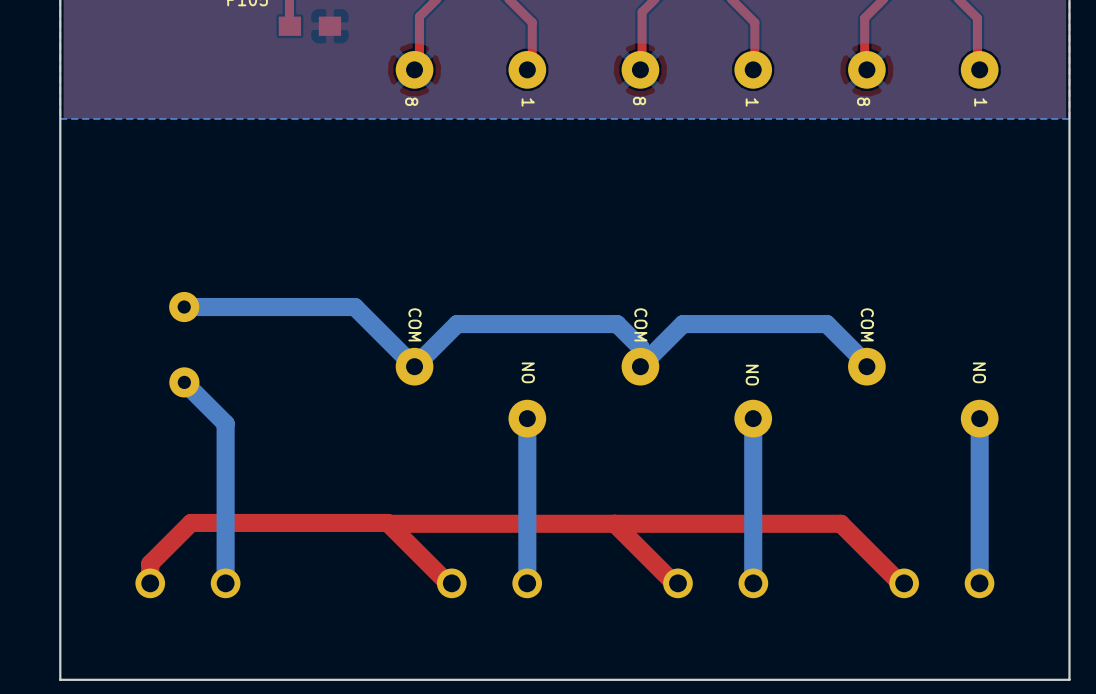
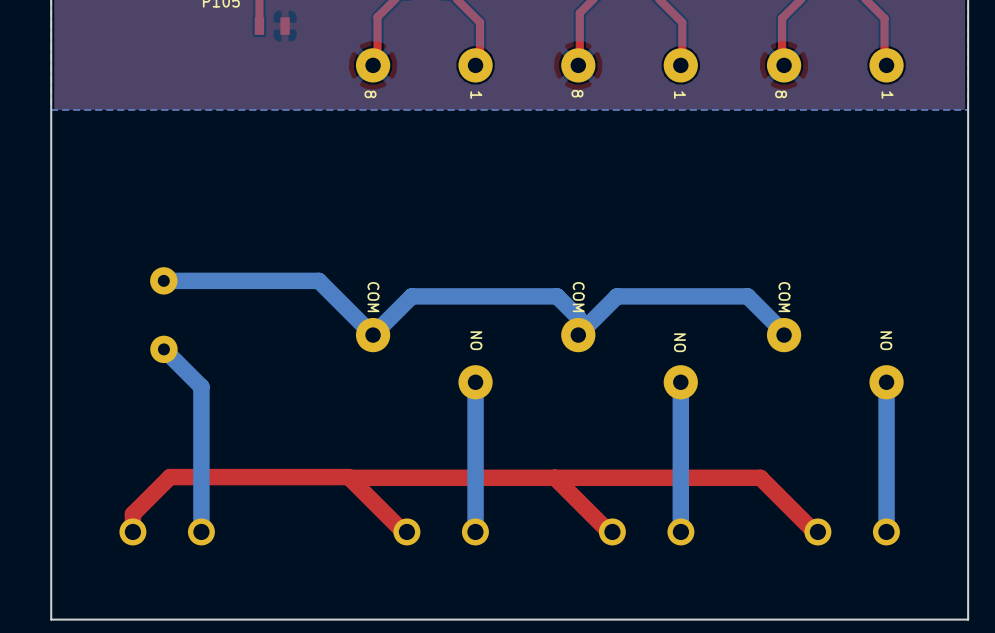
part footprint: [278, 16, 342, 36] -> [254, 17, 290, 35]

